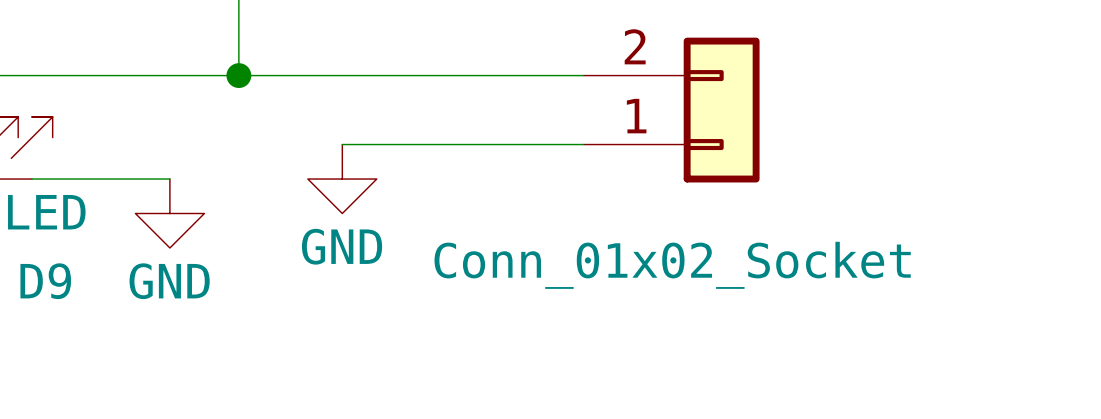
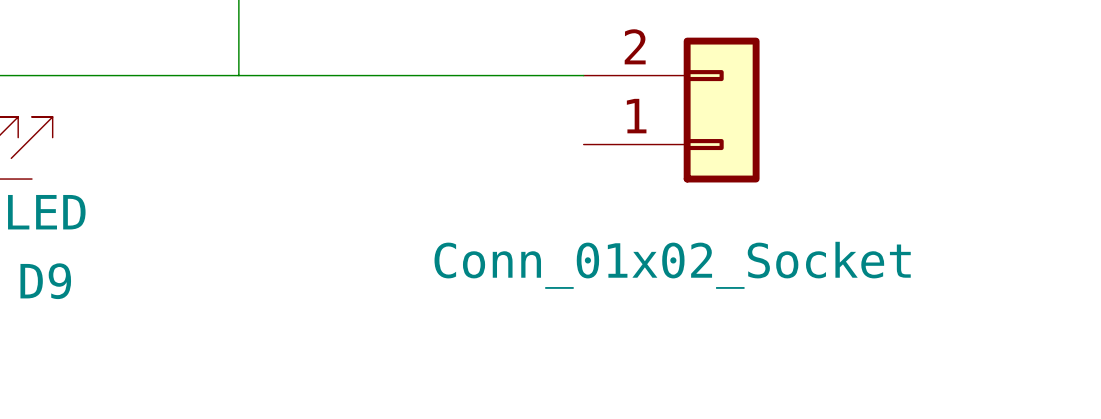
junction: (238, 75) -> none
wire: (342, 144) (583, 144) -> none
wire: (31, 179) (169, 179) -> none
power symbol: GND (342, 179) -> none
power symbol: GND (169, 213) -> none

